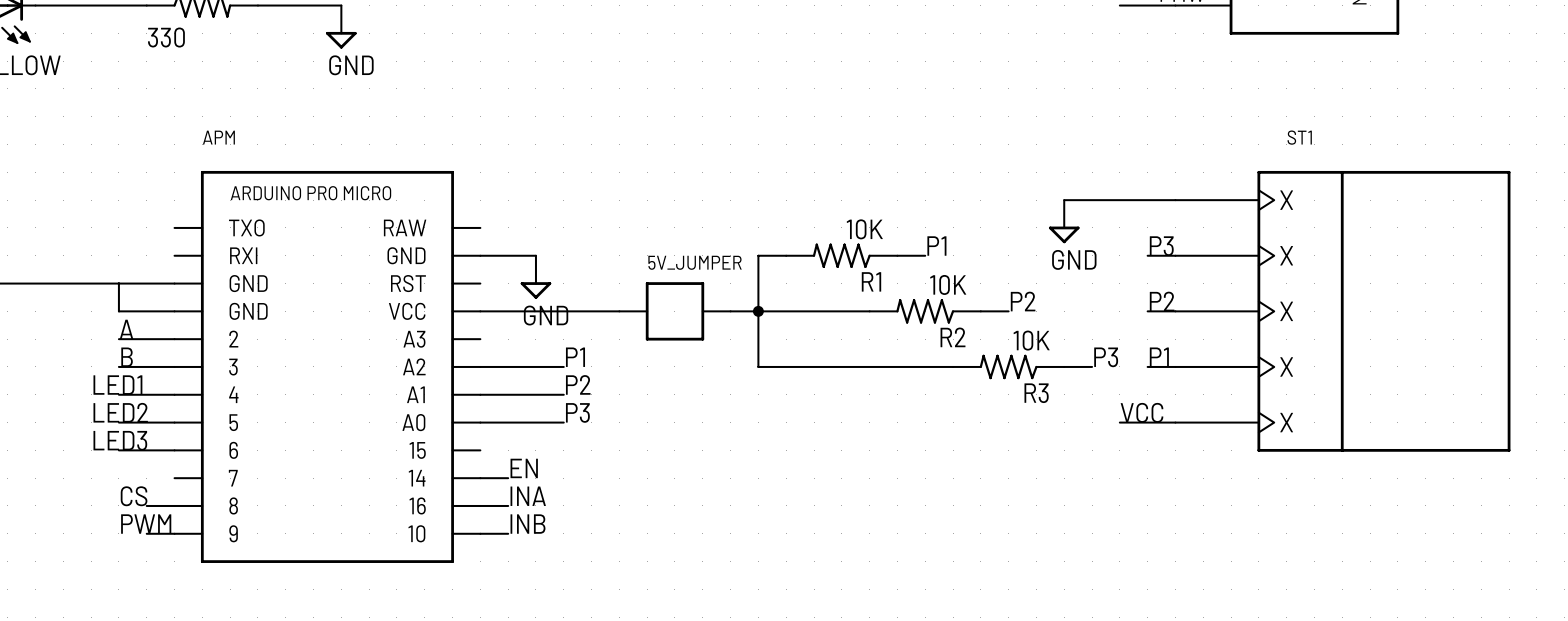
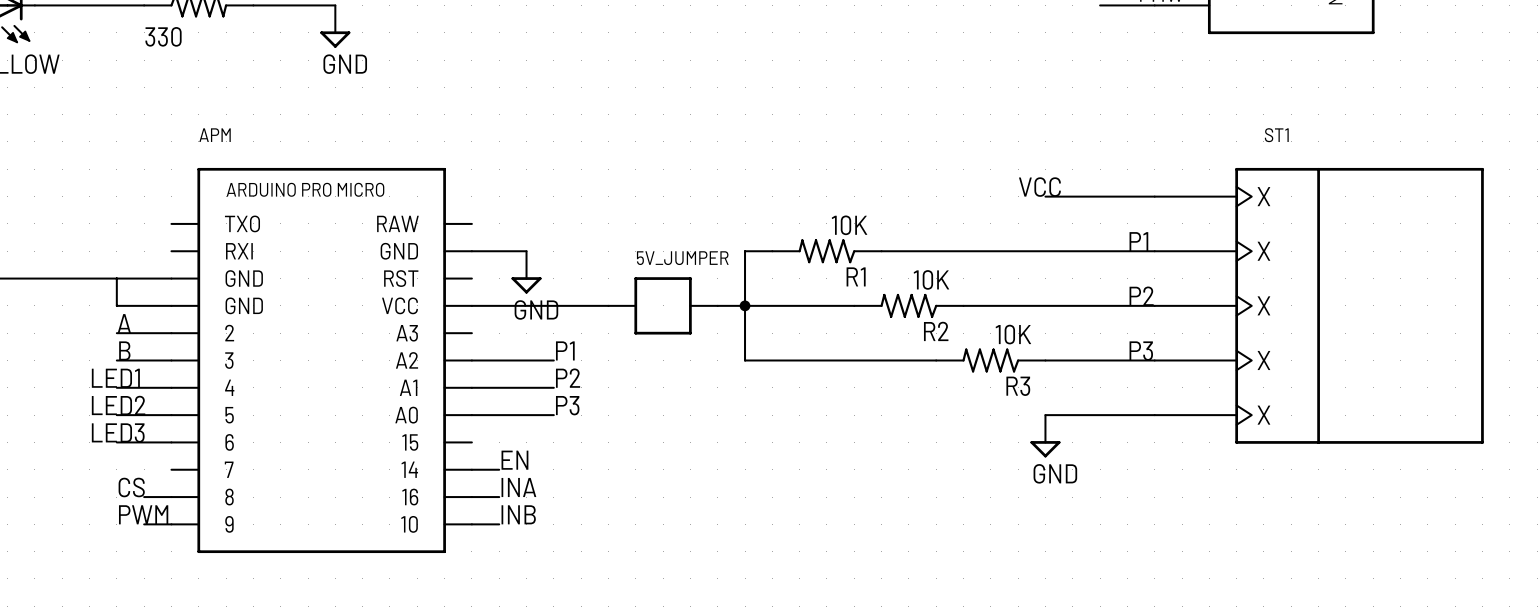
power symbol position: GND (1064, 221) -> GND (1045, 436)
label: P1 (936, 246) -> none
label: P3 (1161, 246) -> P1 (1138, 241)
wire: none -> (908, 251) (1127, 251)
label: P2 (1023, 301) -> none
wire: none -> (990, 305) (1127, 305)
label: P3 (1106, 357) -> none
label: P1 (1159, 357) -> P3 (1141, 351)
wire: none -> (1072, 360) (1127, 360)
label position: VCC (1142, 412) -> VCC (1039, 187)
wire: none -> (1045, 415) (1100, 415)

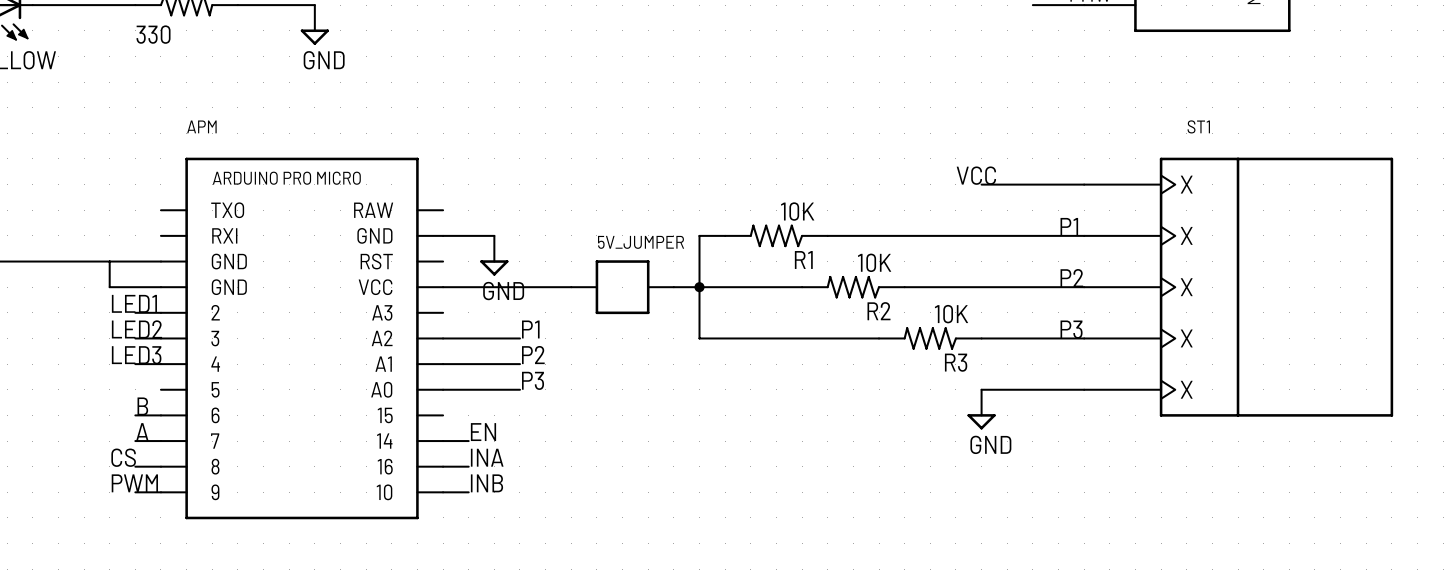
label: A (124, 323) -> LED1 (134, 303)
wire: (116, 333) (144, 333) -> none
label: B (124, 350) -> LED2 (136, 329)
wire: (116, 360) (144, 360) -> none
label: LED1 (115, 378) -> none
wire: (116, 387) (144, 387) -> none
label: LED2 (118, 405) -> none
wire: (116, 415) (171, 415) -> none
label position: LED3 (118, 432) -> LED3 (136, 355)
label: none -> B (142, 406)
wire: (116, 442) (144, 442) -> (135, 441) (160, 441)
label: none -> A (142, 432)

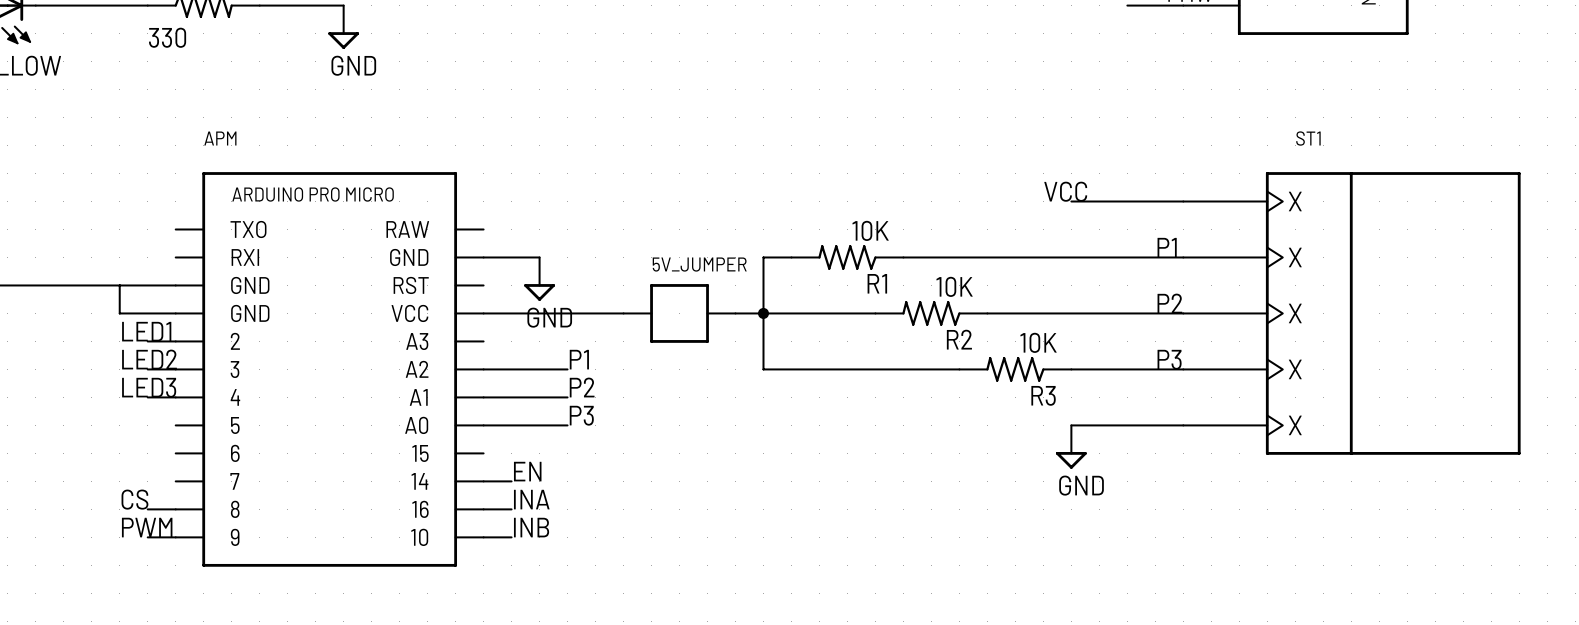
label: B (142, 406) -> none
wire: (135, 415) (160, 415) -> none
label: A (142, 432) -> none
wire: (135, 441) (160, 441) -> none

